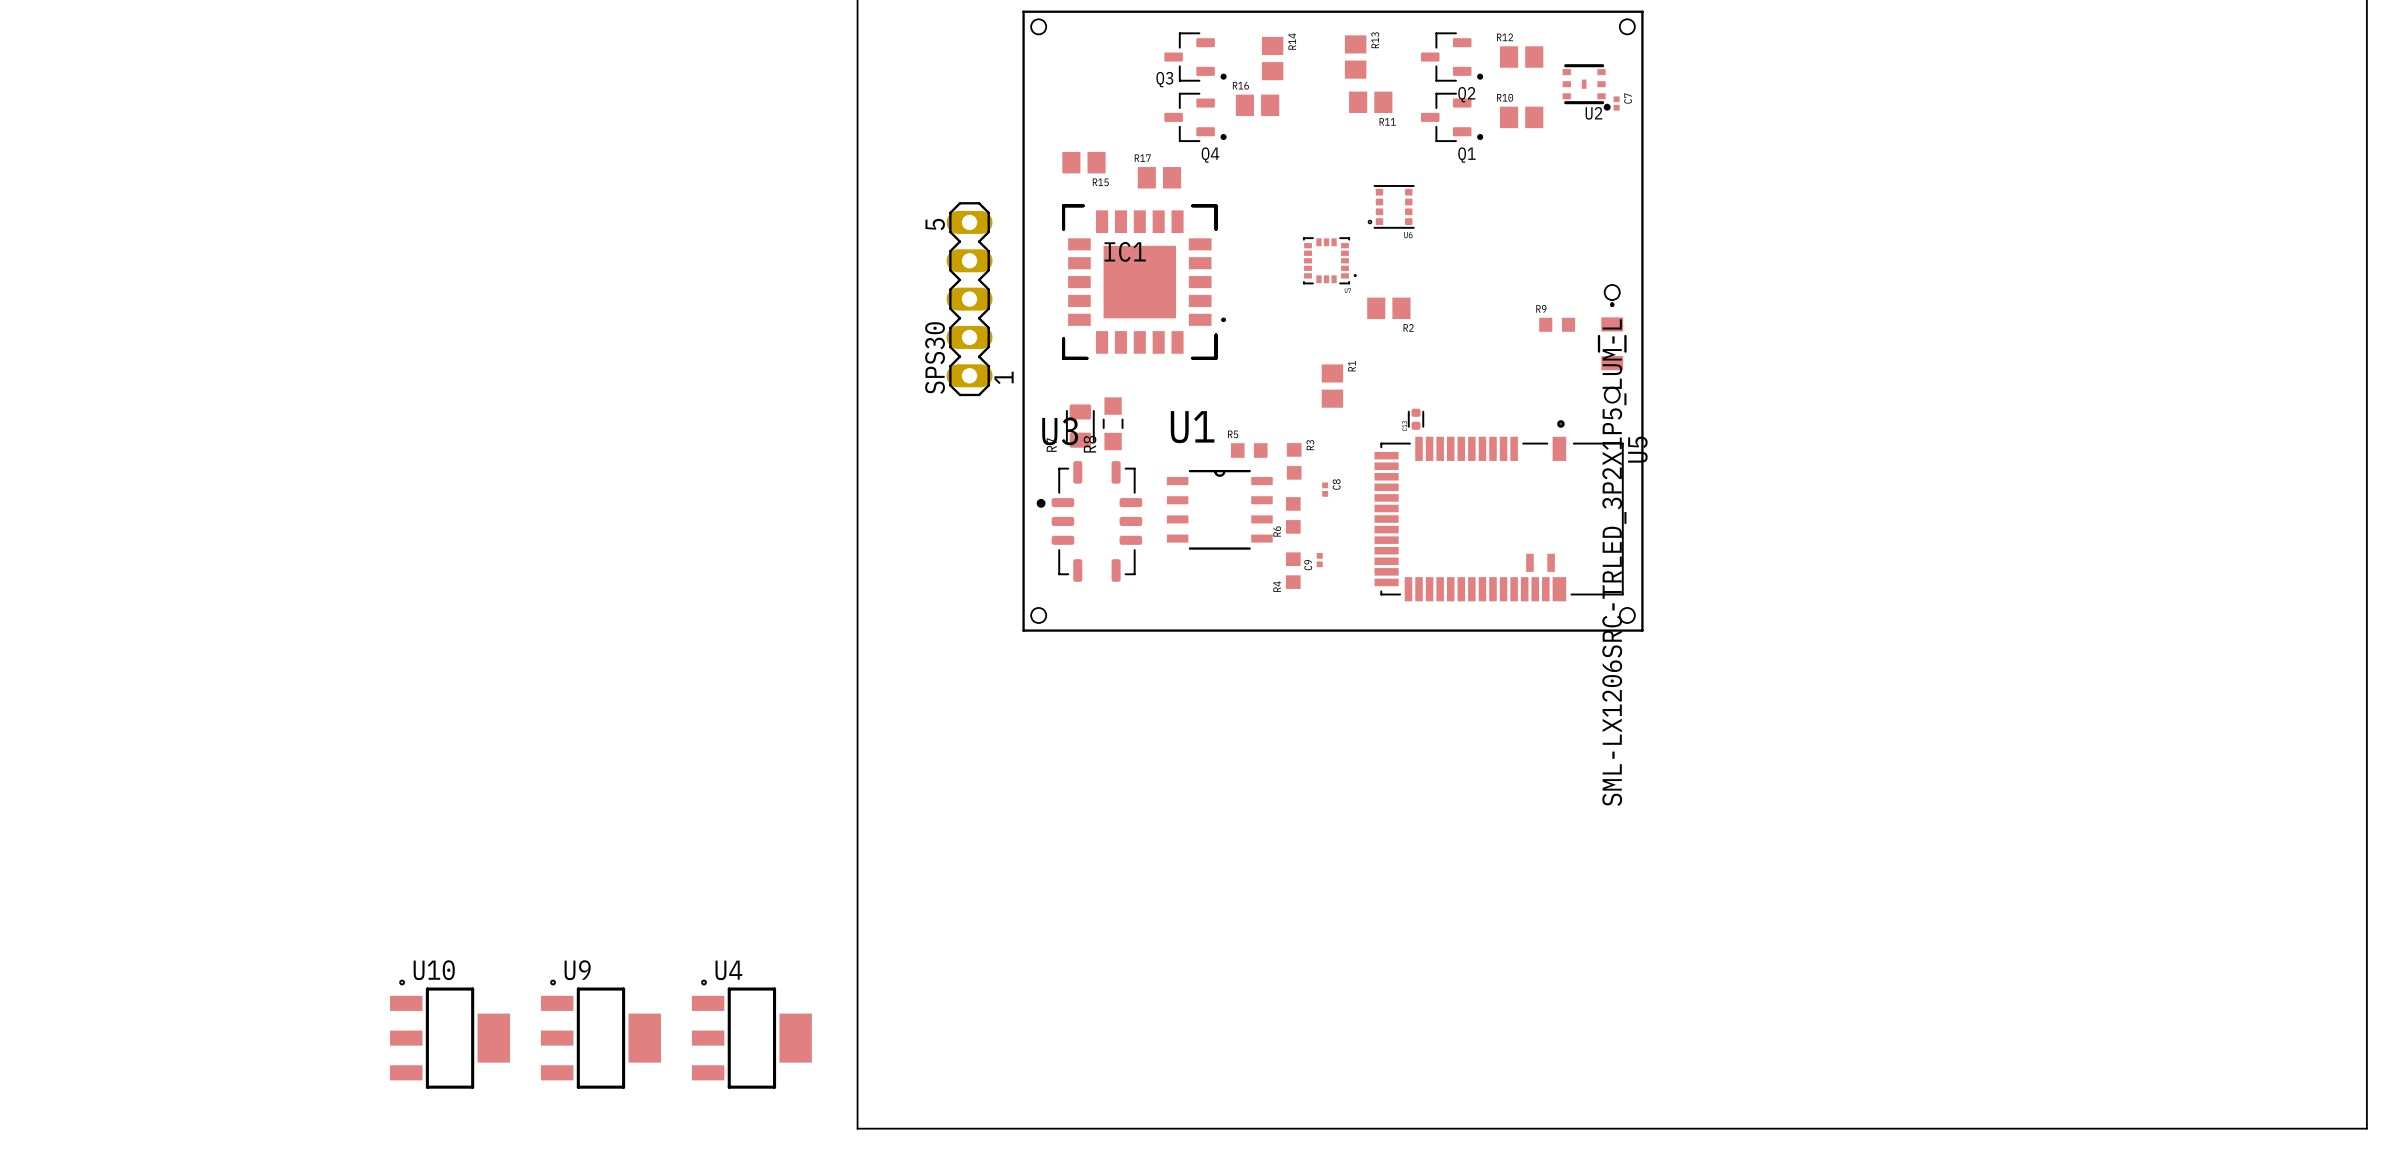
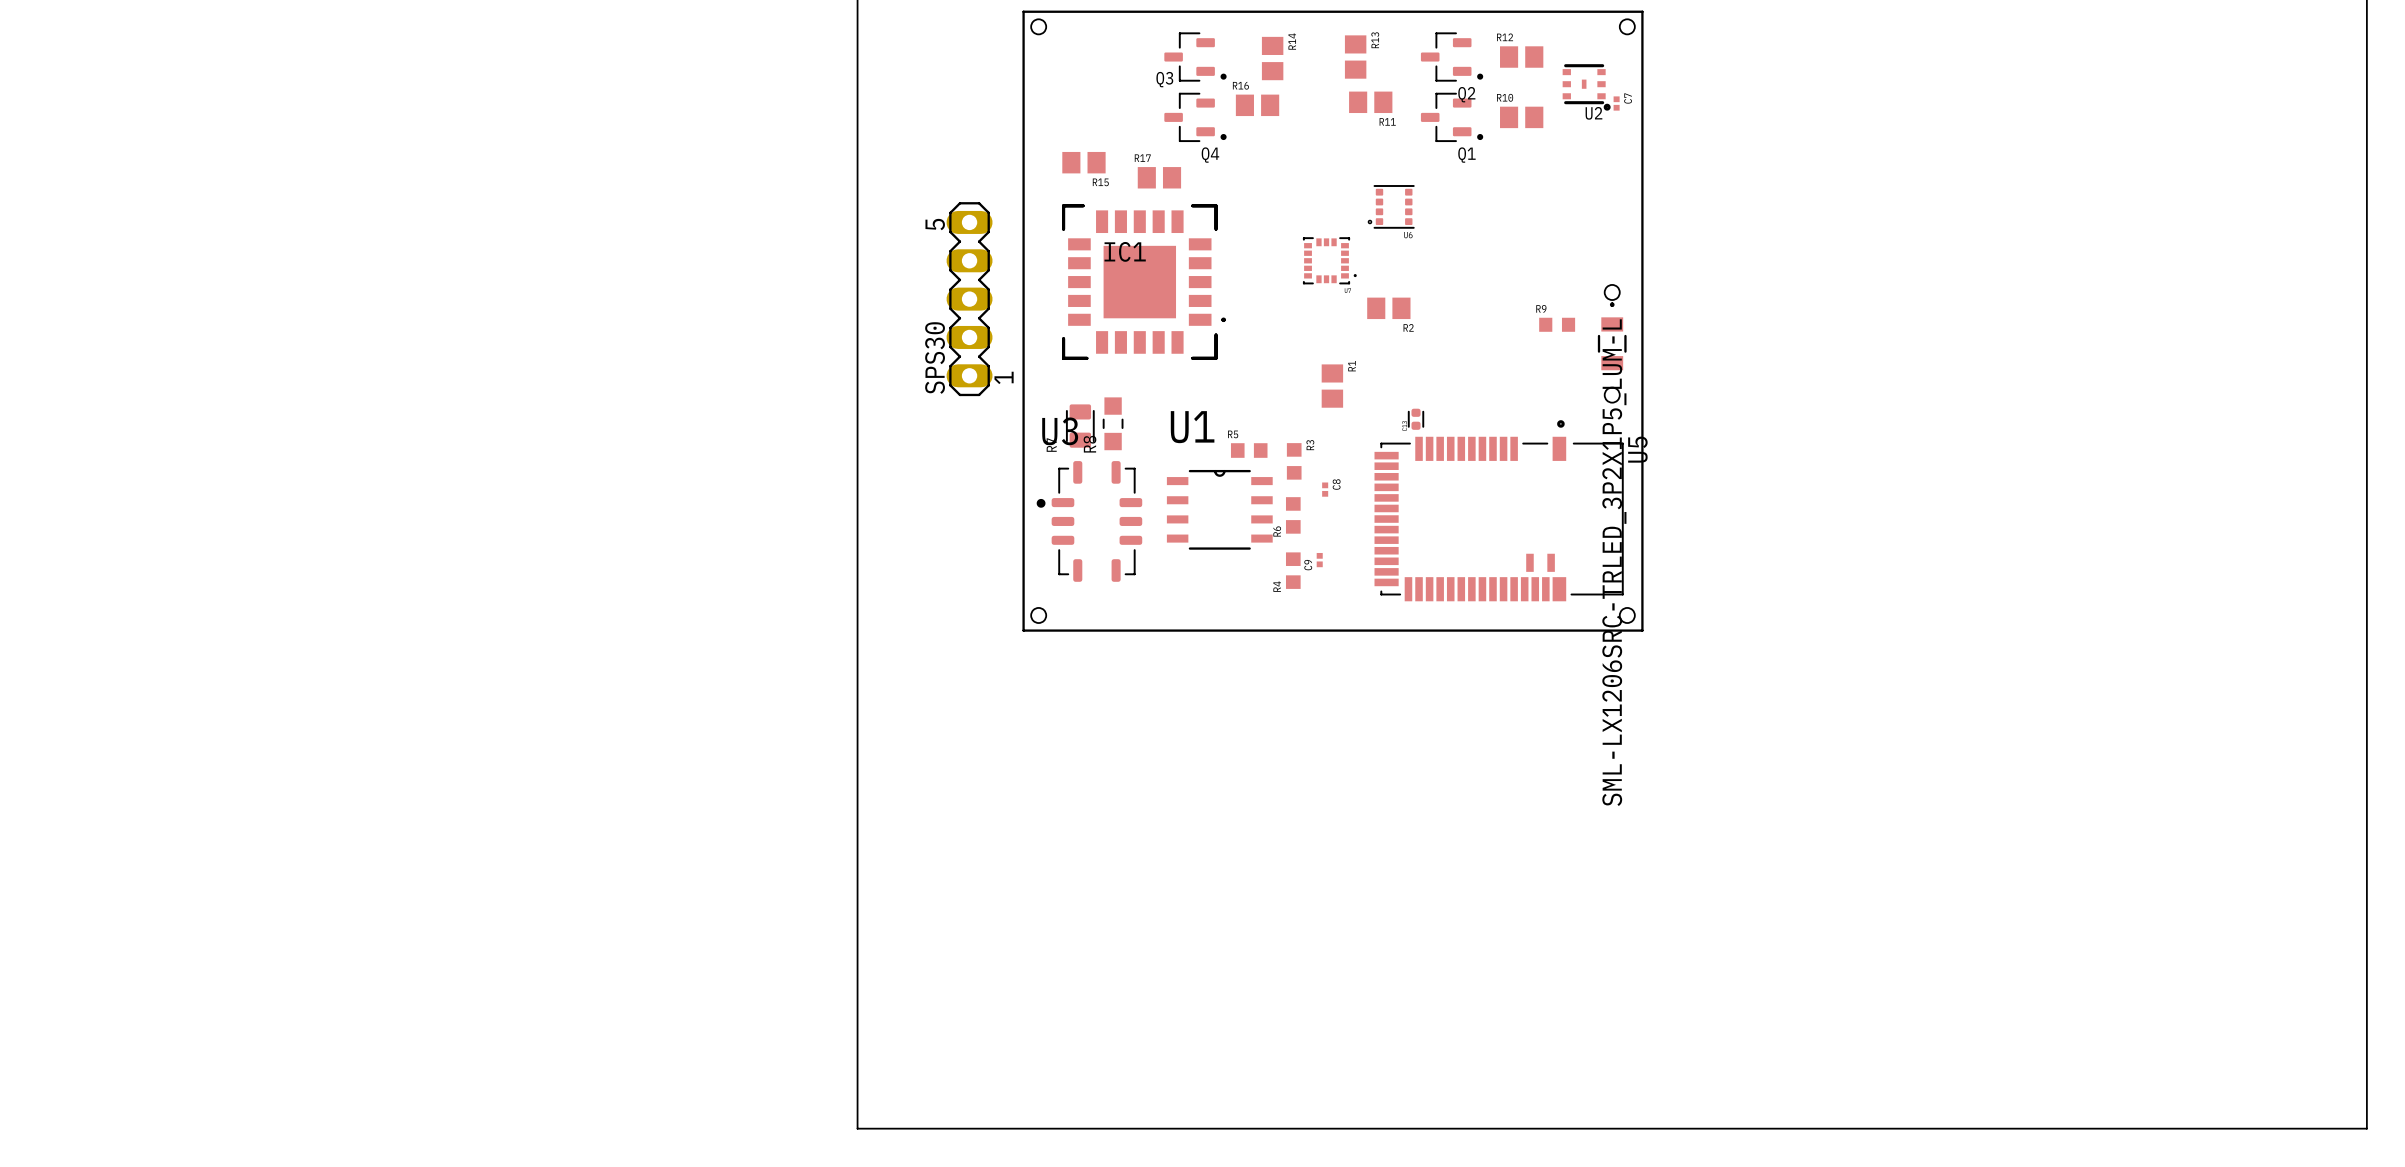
U10: (450, 1034) -> none
U9: (600, 1034) -> none
U4: (751, 1034) -> none

